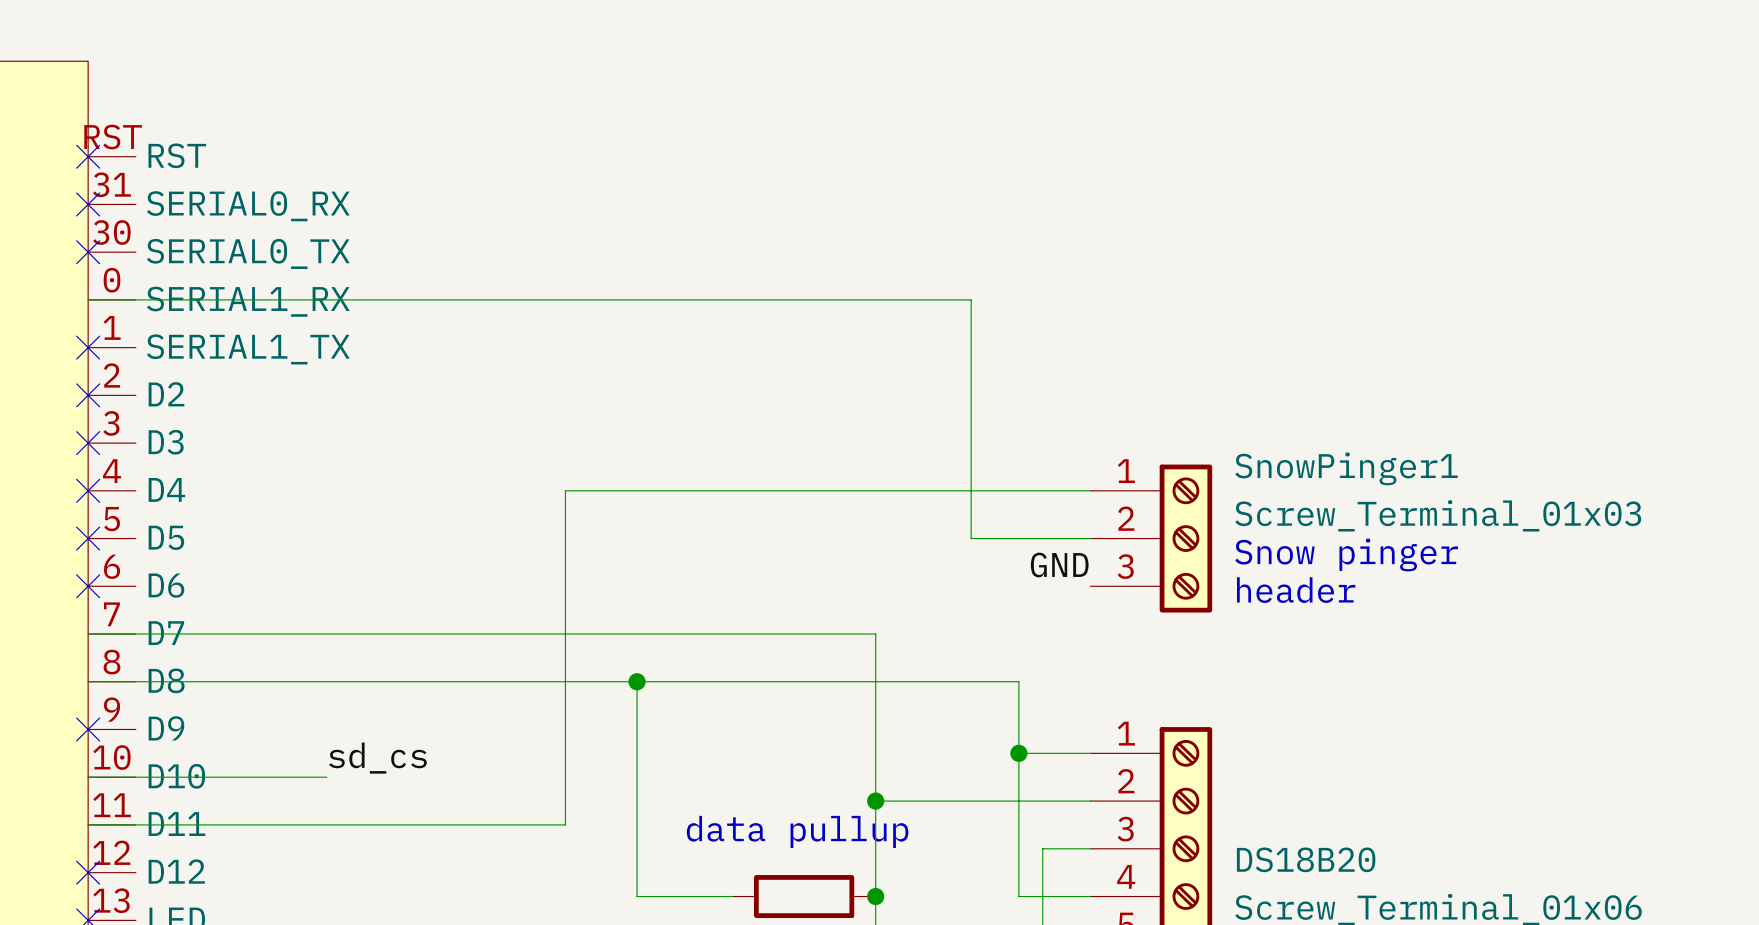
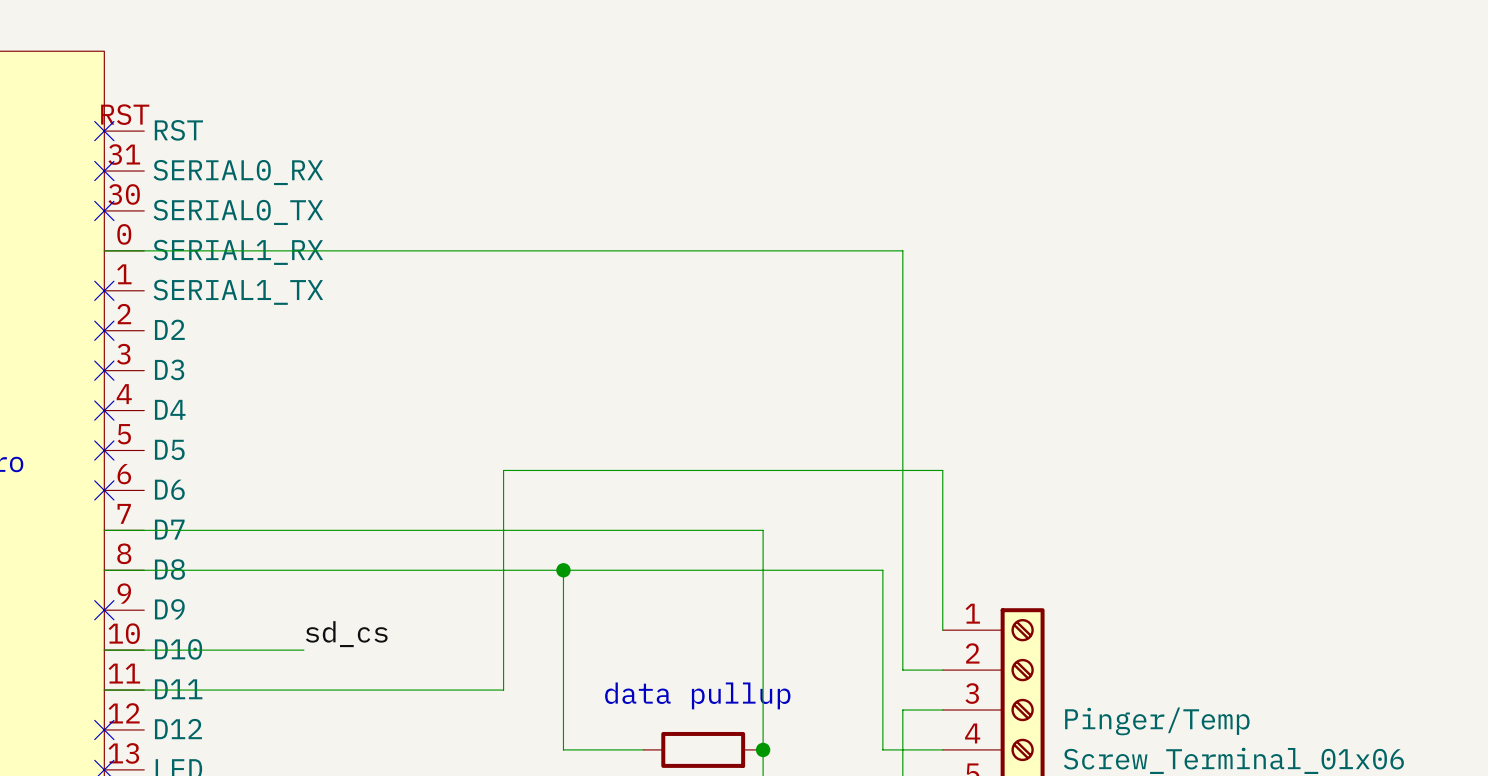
wire: (971, 299) (971, 538) (1090, 538) -> (842, 250) (902, 250) (902, 670)
wire: (1090, 490) (565, 490) (565, 562) -> (942, 630) (942, 470) (503, 470)
SnowPinger1: Screw_Terminal_01x03 (1151, 538) -> none
text: Snow pinger (1346, 554) -> none
label: GND (1059, 564) -> none
text: header (1296, 590) -> none
wire: (1018, 753) (1090, 753) -> none
junction: (1018, 753) -> none
wire: (875, 801) (1042, 801) -> none
junction: (875, 801) -> none
DS18B20 name: DS18B20 (1306, 859) -> Pinger/Temp (1157, 721)

